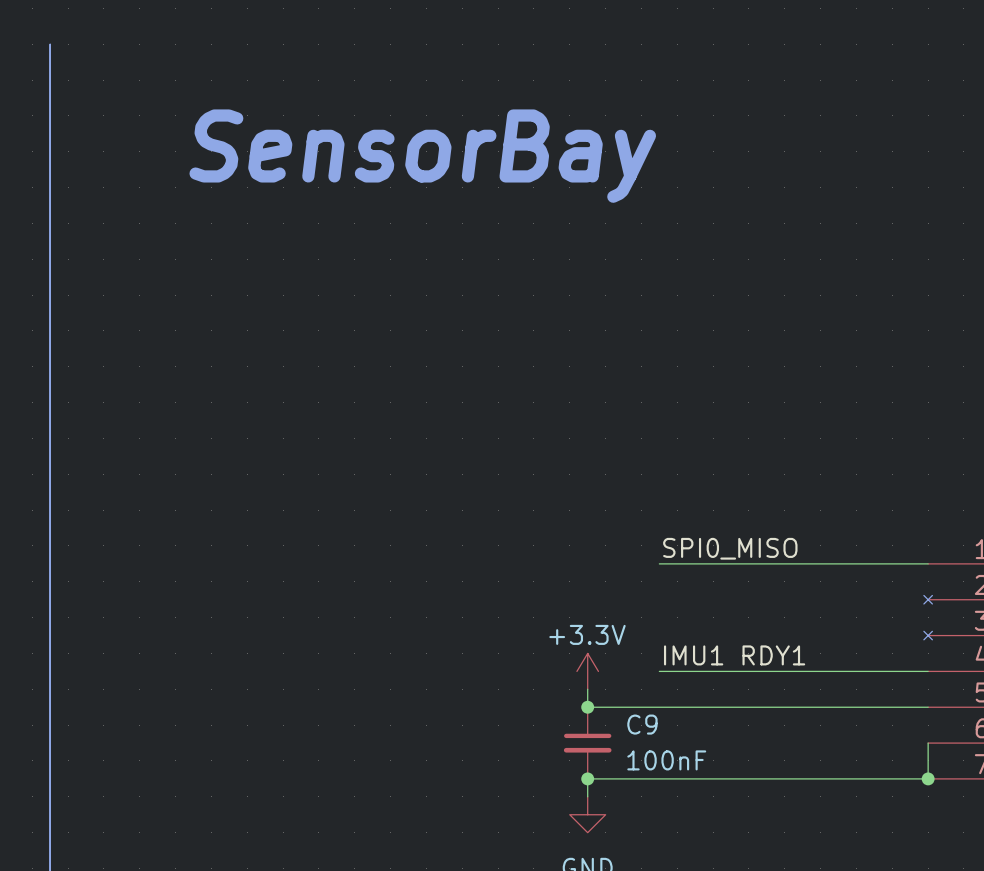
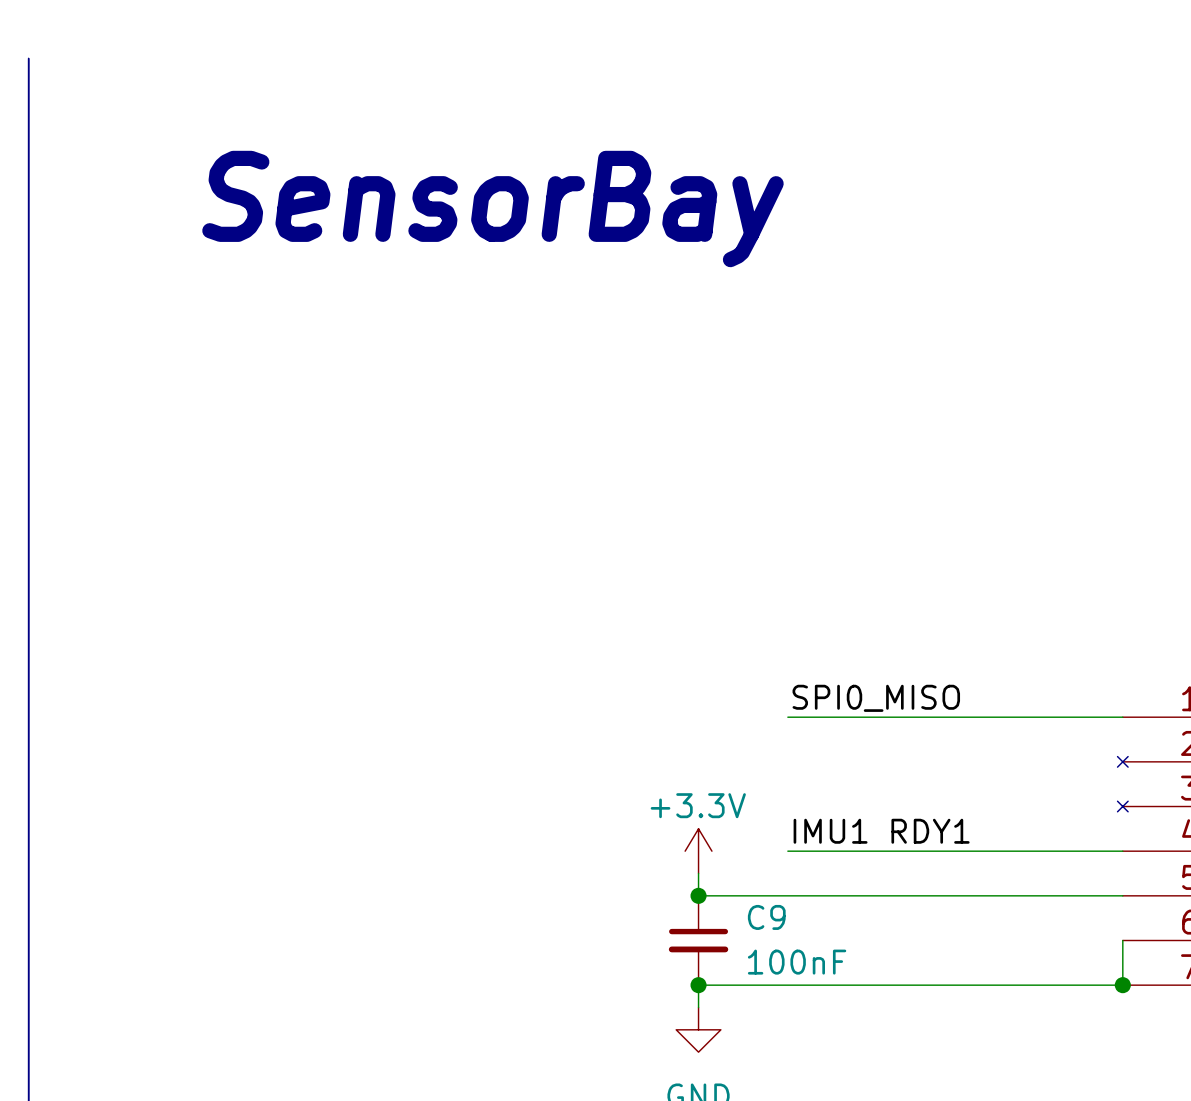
line: none -> (28, 58) (28, 69)

